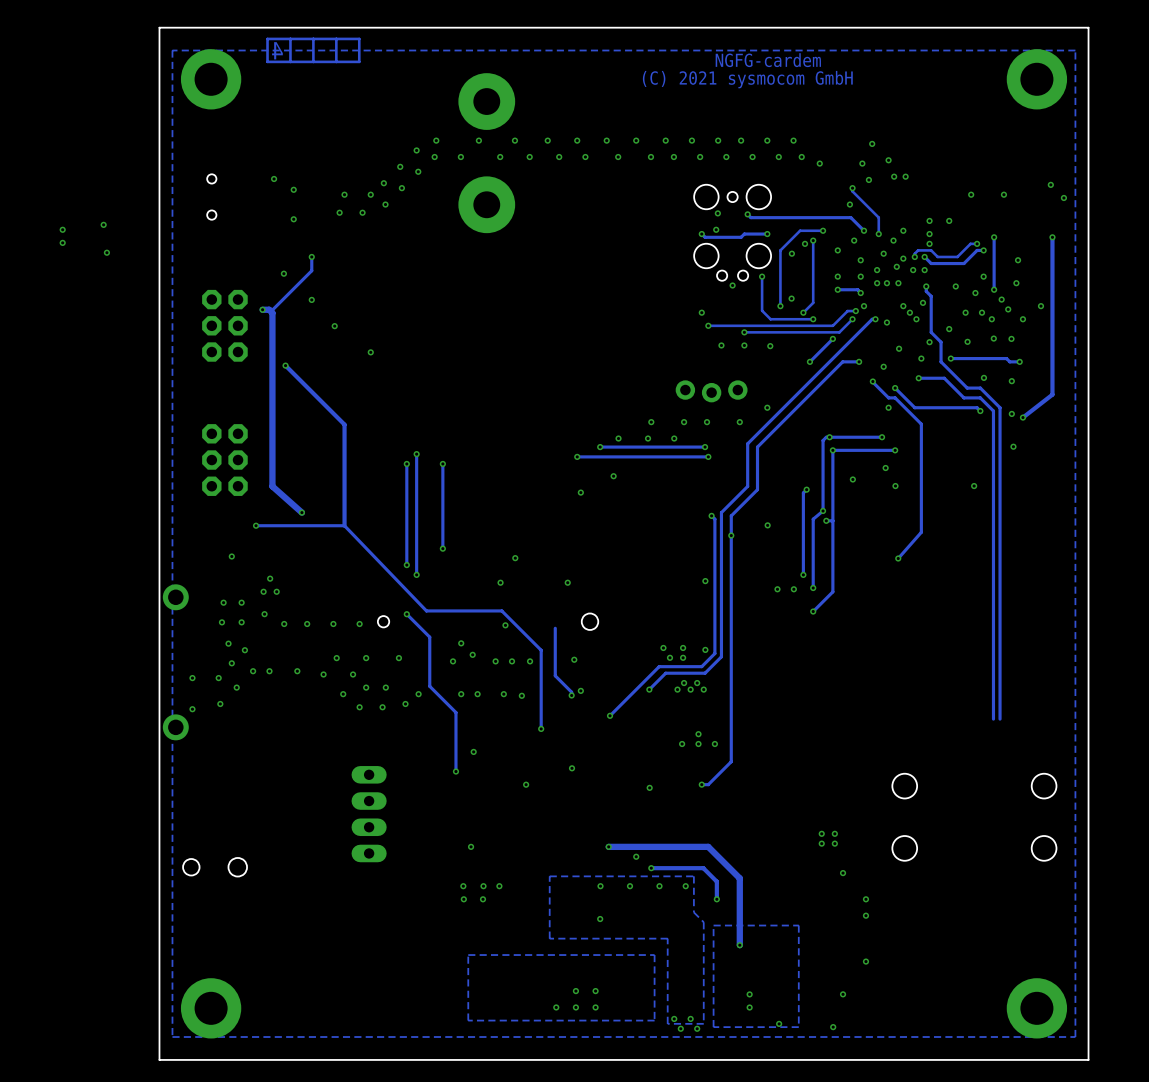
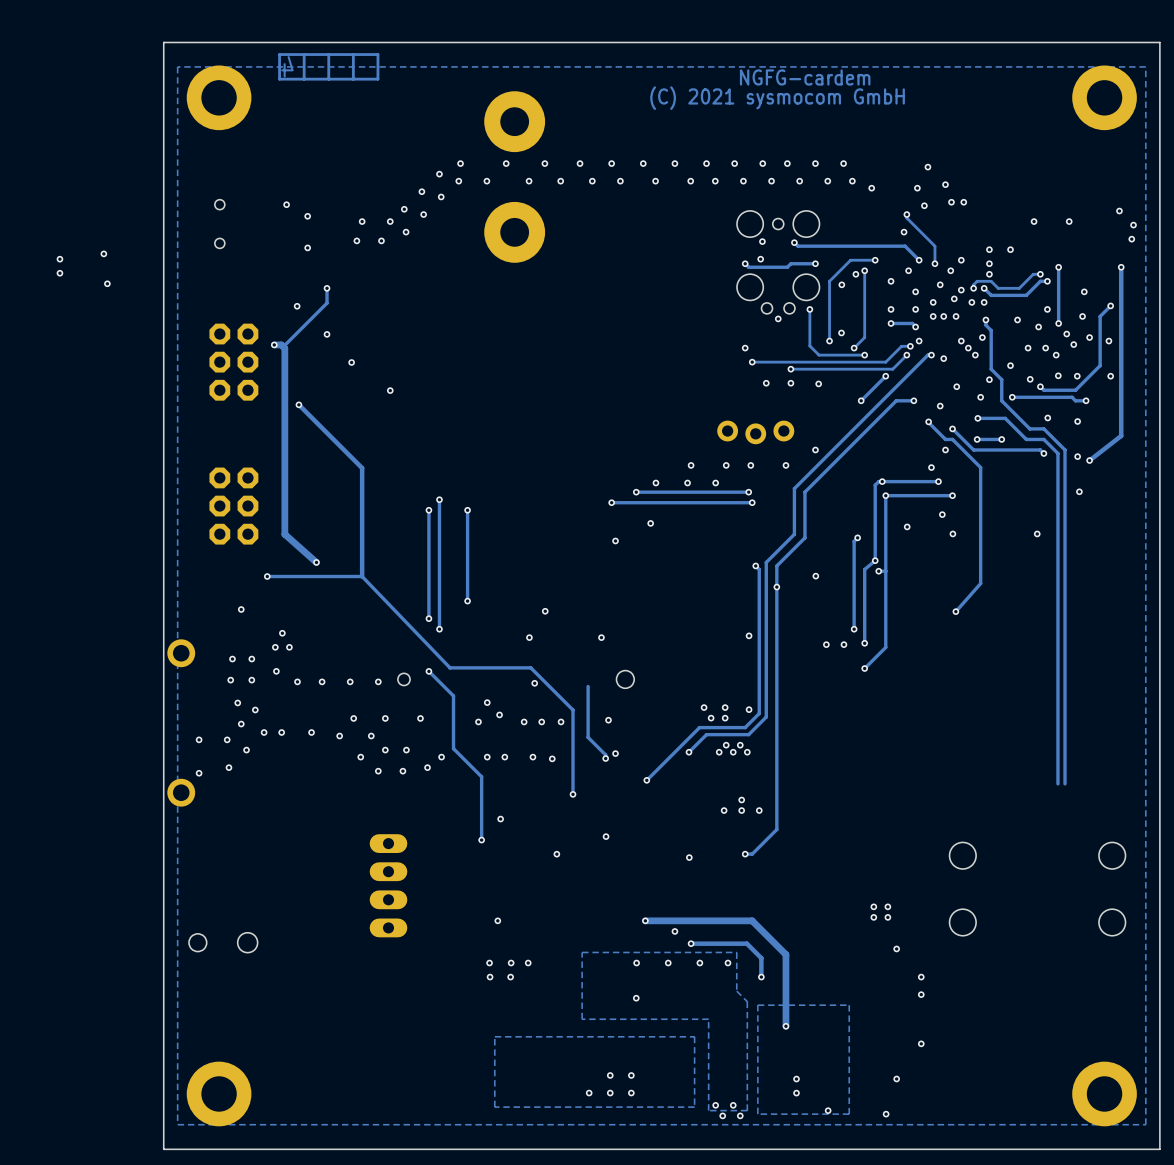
via: none -> (1131, 239)
track: none -> (1110, 305) (1100, 316) (1100, 365) (1075, 390) (1043, 390) (1040, 386)
via: none -> (1110, 305)
via: none -> (1089, 337)
via: (1022, 319) -> none
via: none -> (1110, 376)
via: none -> (1040, 386)
via: none -> (977, 439)
track: none -> (1001, 439) (977, 439)
via: none -> (1001, 439)
via: none -> (931, 467)

